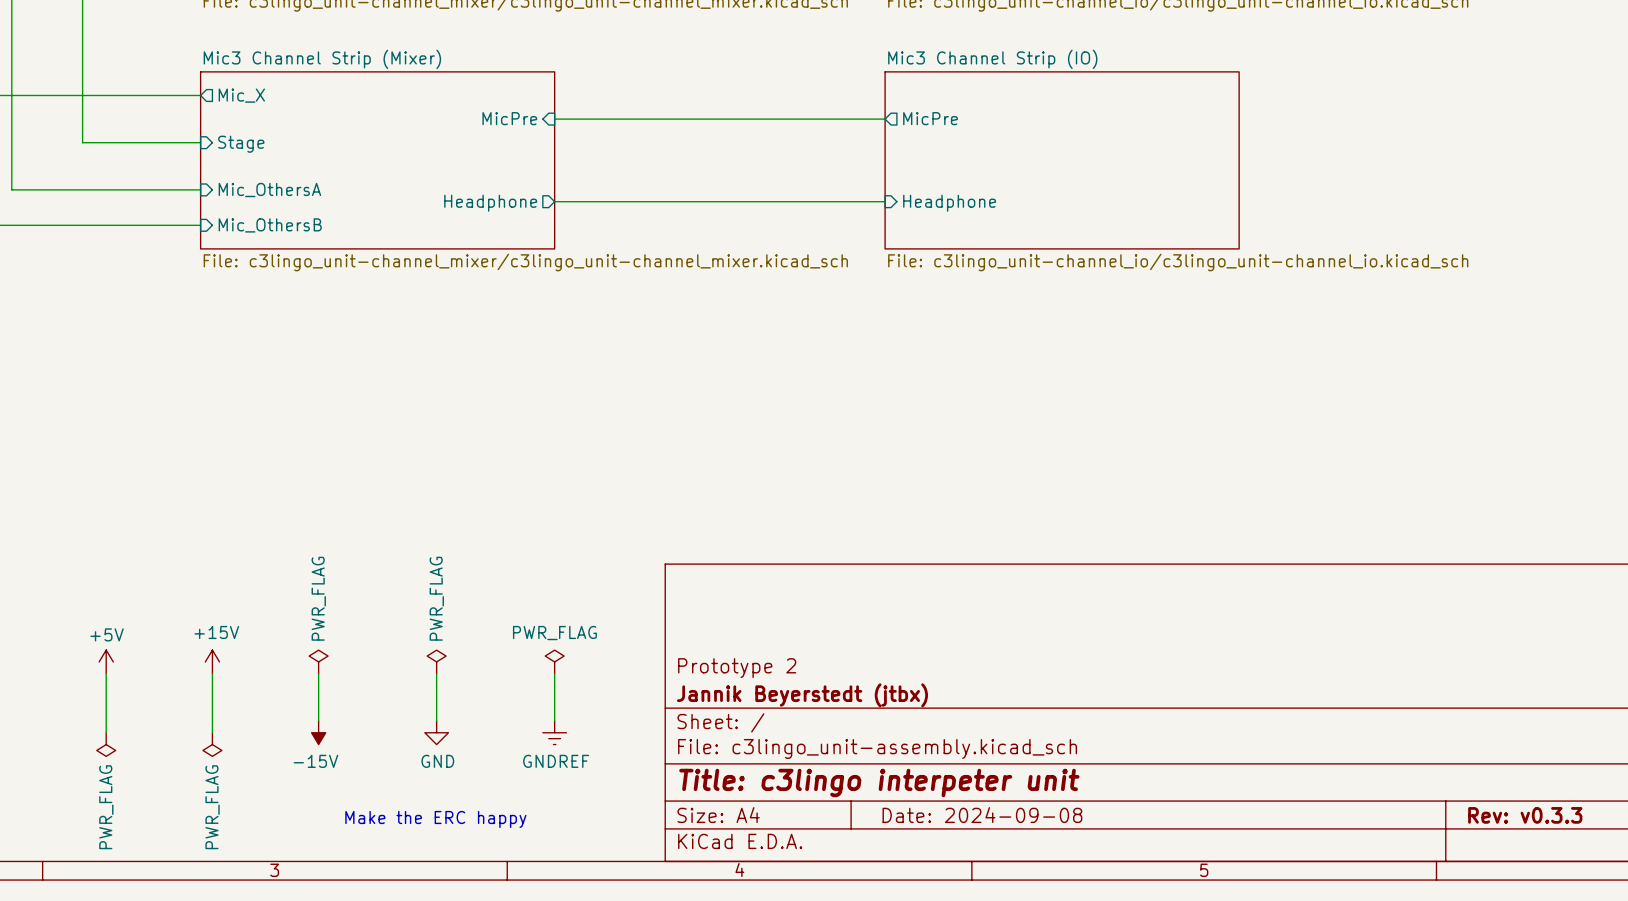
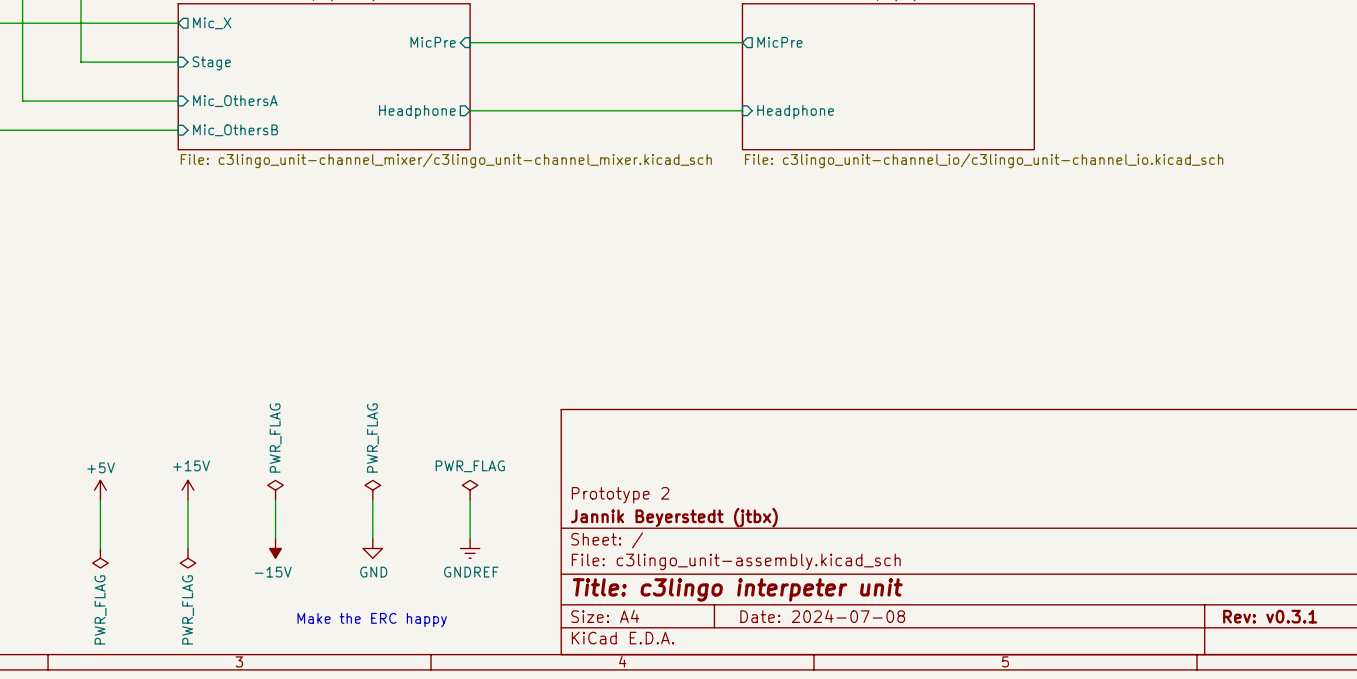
title block: Date: 2024-09-08 (982, 815) -> Date: 2024-07-08 (822, 616)
title block: Rev: v0.3.3 (1525, 815) -> Rev: v0.3.1 (1270, 616)

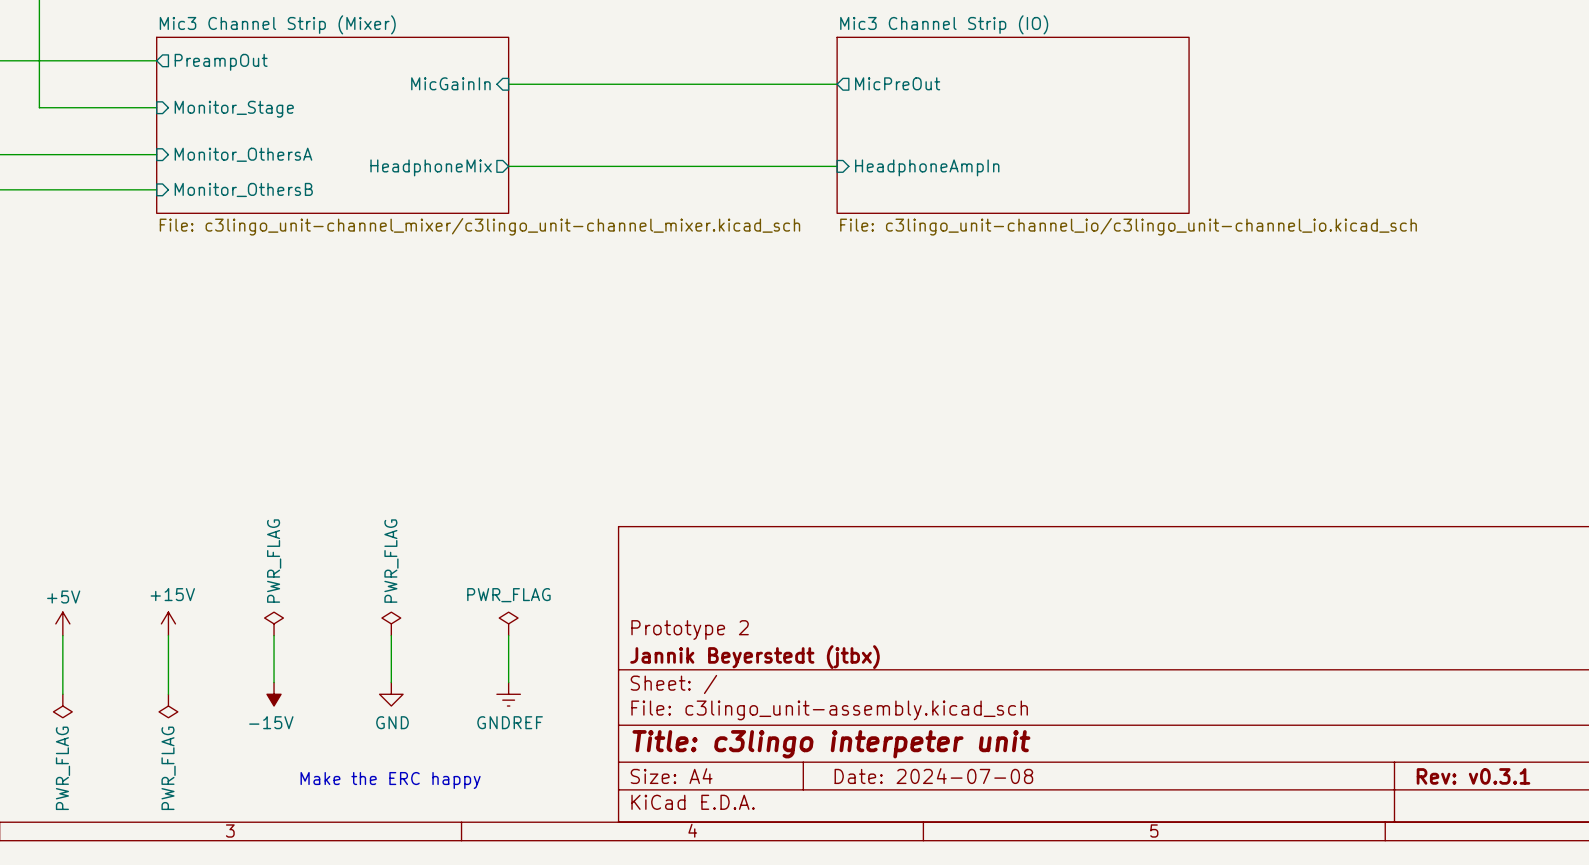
sheet pin: Mic_X (212, 23) -> PreampOut (221, 62)
sheet pin: MicPre (433, 42) -> MicGainIn (450, 83)
sheet pin: MicPre (779, 42) -> MicPreOut (897, 83)
sheet pin: Stage (211, 63) -> Monitor_Stage (234, 109)
sheet pin: Mic_OthersA (235, 101) -> Monitor_OthersA (243, 154)
sheet pin: Headphone (417, 112) -> HeadphoneMix (431, 167)
sheet pin: Headphone (795, 112) -> HeadphoneAmpIn (927, 167)
sheet pin: Mic_OthersB (235, 130) -> Monitor_OthersB (243, 189)

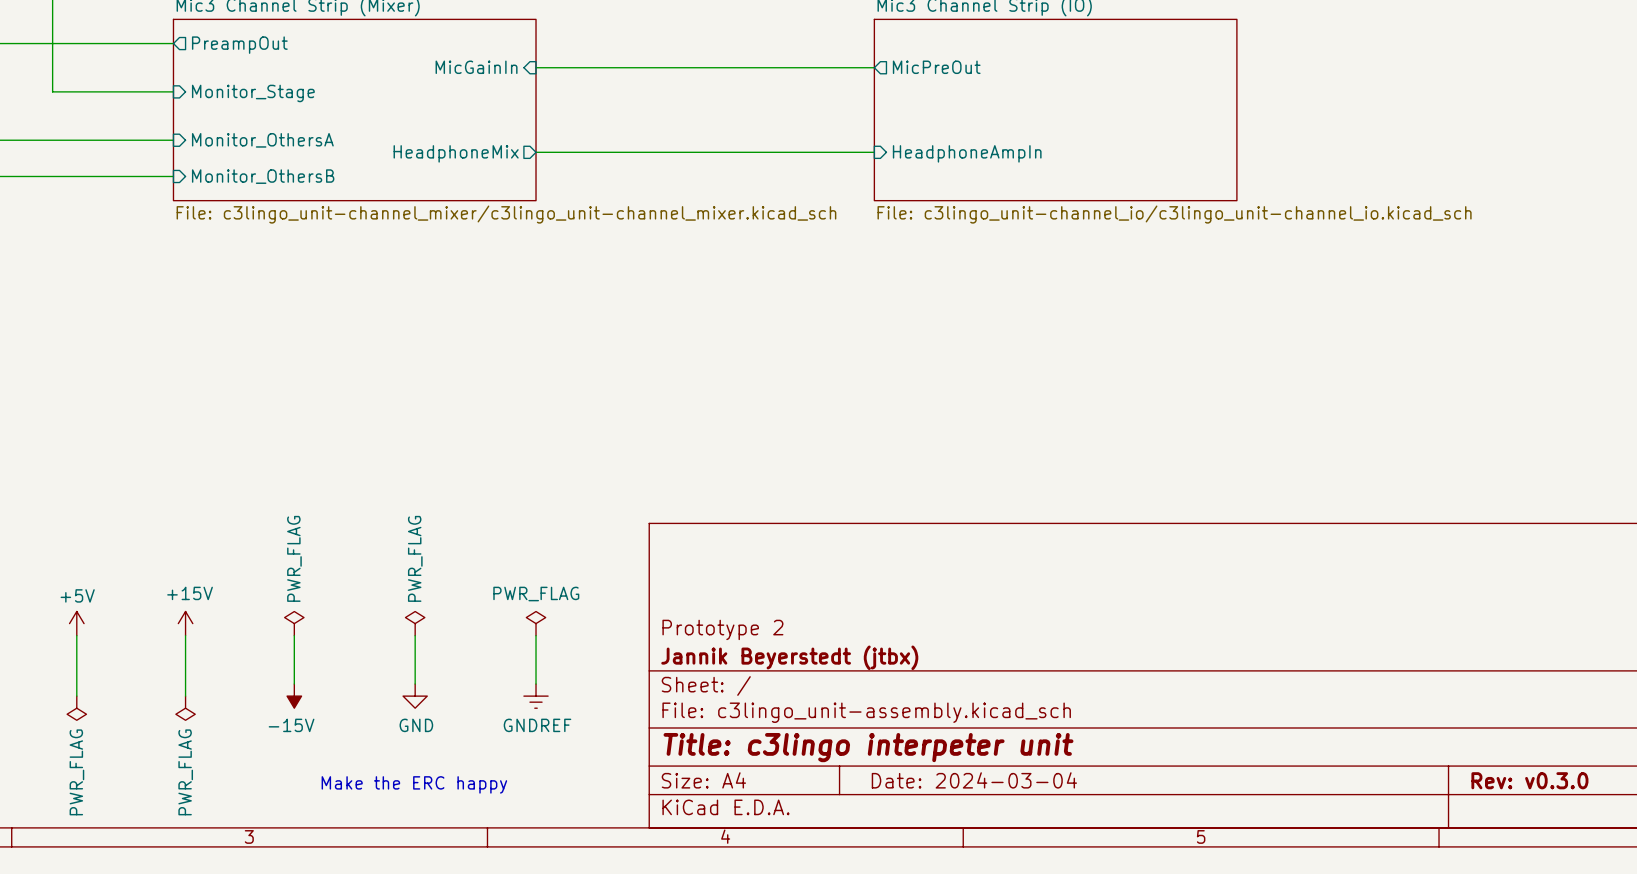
title block: Date: 2024-07-08 (933, 776) -> Date: 2024-03-04 (974, 780)
title block: Rev: v0.3.1 (1473, 776) -> Rev: v0.3.0 (1529, 780)

